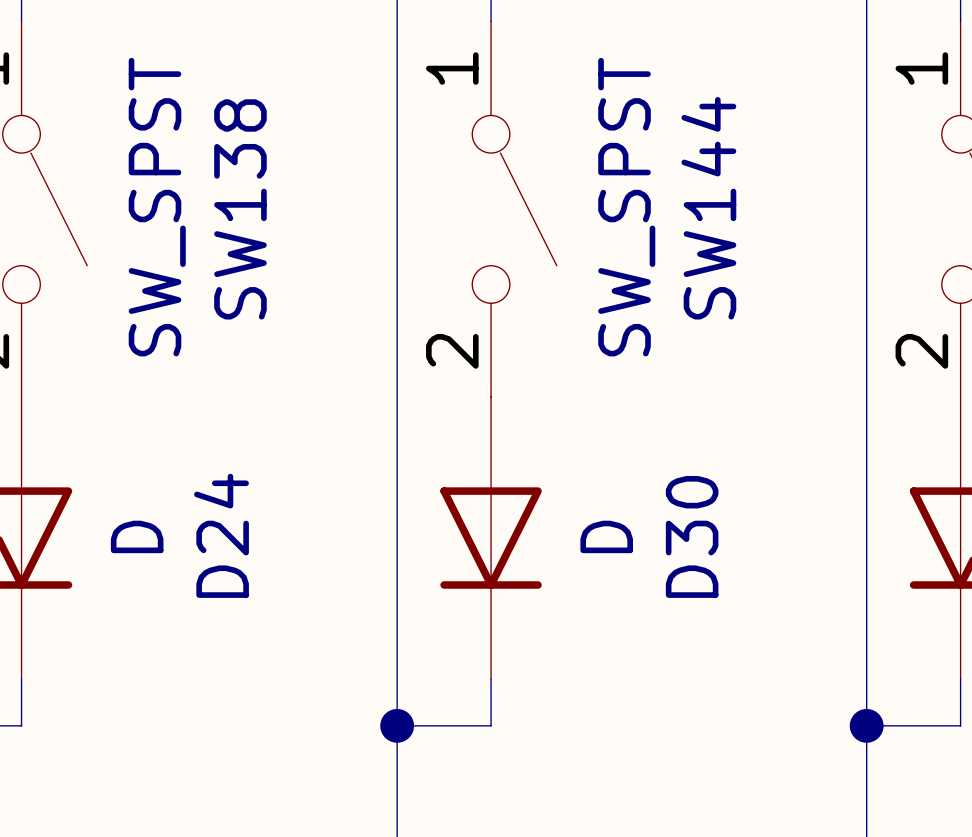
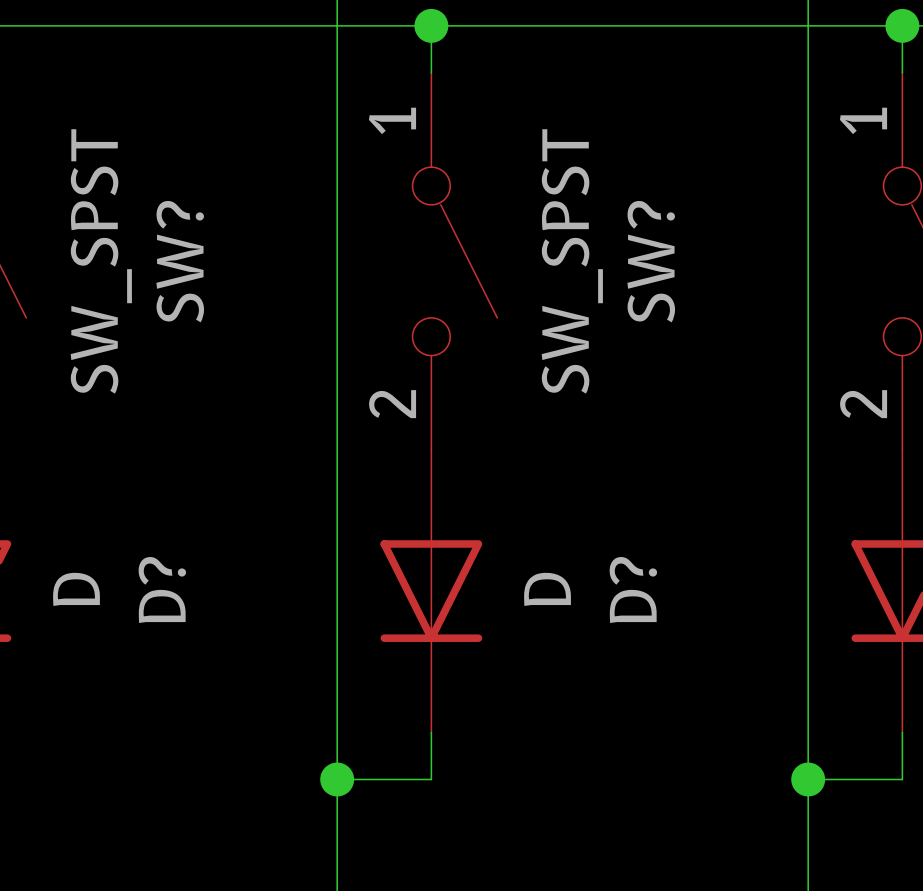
SW144 name: SW144 (708, 208) -> SW? (651, 261)
SW138 name: SW138 (240, 209) -> SW? (180, 261)
D24 name: D24 (221, 535) -> D? (162, 590)
D30 name: D30 (692, 536) -> D? (633, 590)

